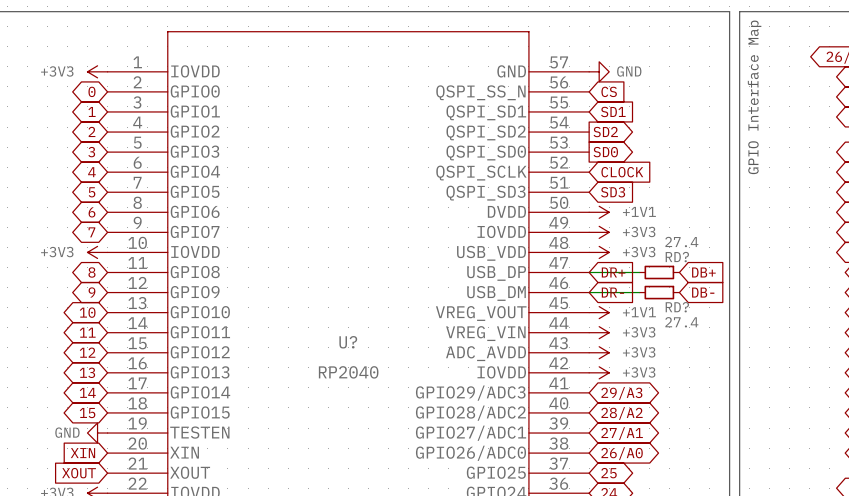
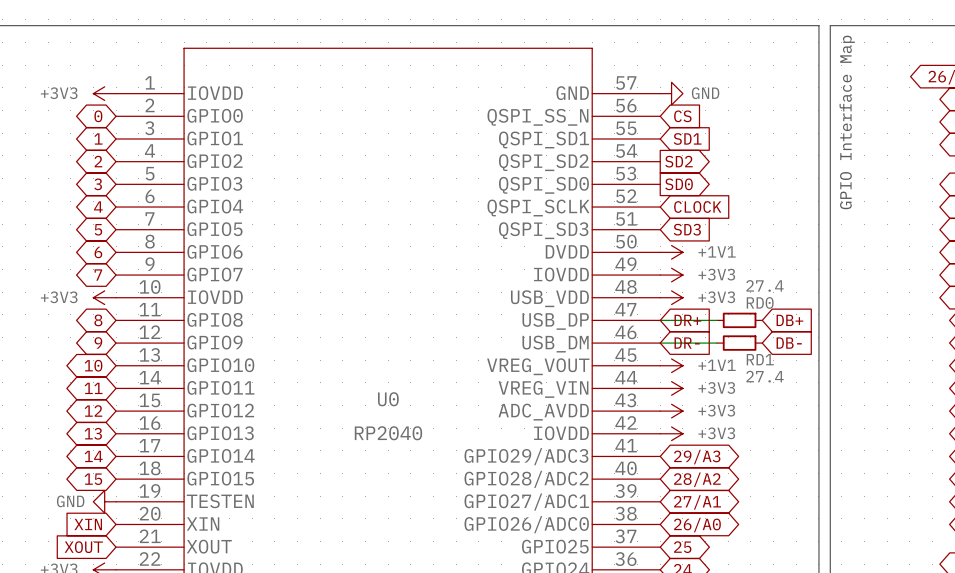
RD? name: RD? (677, 257) -> RD0 (760, 302)
RD? name: RD? (677, 307) -> RD1 (760, 359)
U? name: U? (348, 342) -> U0 (388, 399)

